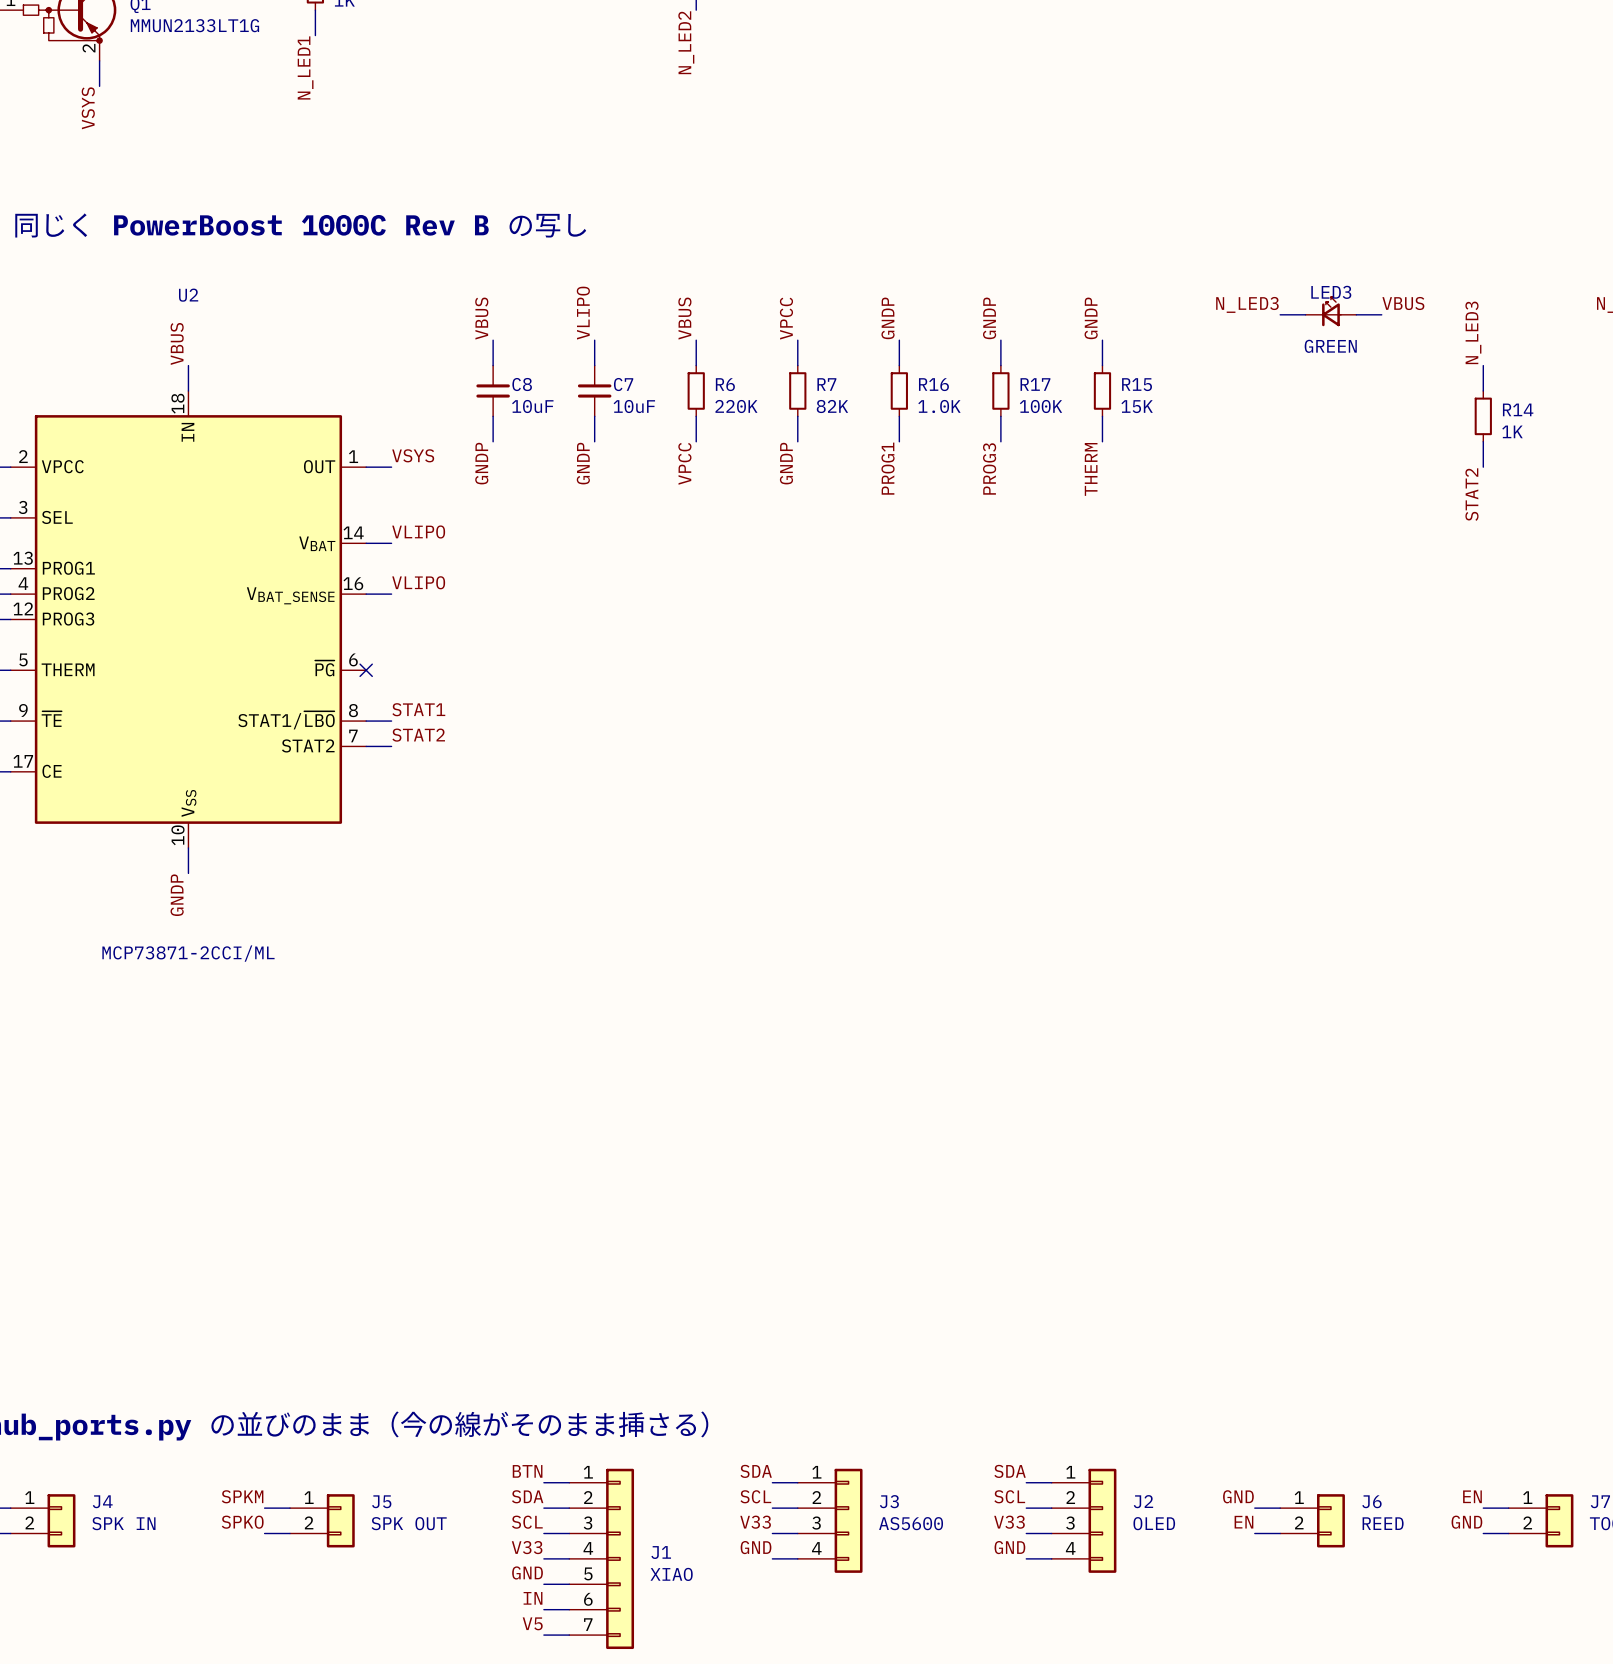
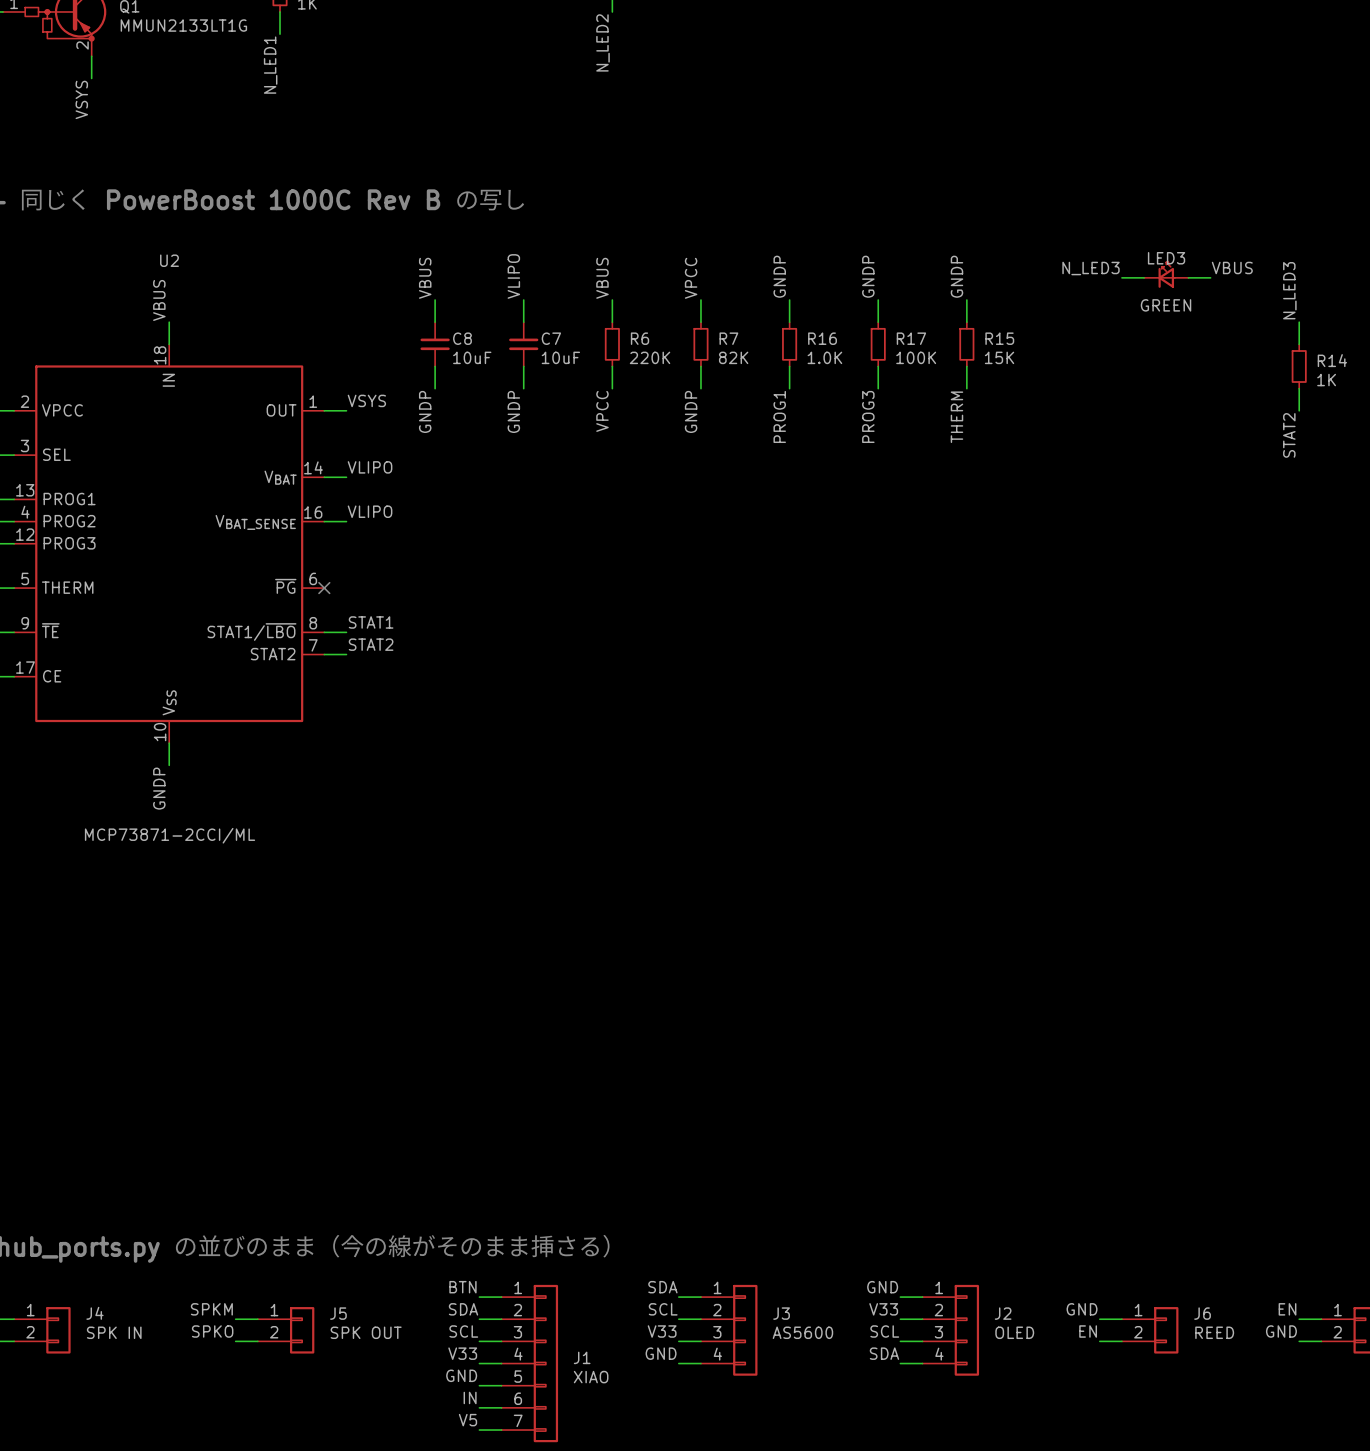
label: SDA (1010, 1471) -> GND (882, 1287)
label: SCL (1009, 1496) -> V33 (883, 1309)
label: V33 (1009, 1522) -> SCL (884, 1331)
label: GND (1009, 1547) -> SDA (884, 1353)

